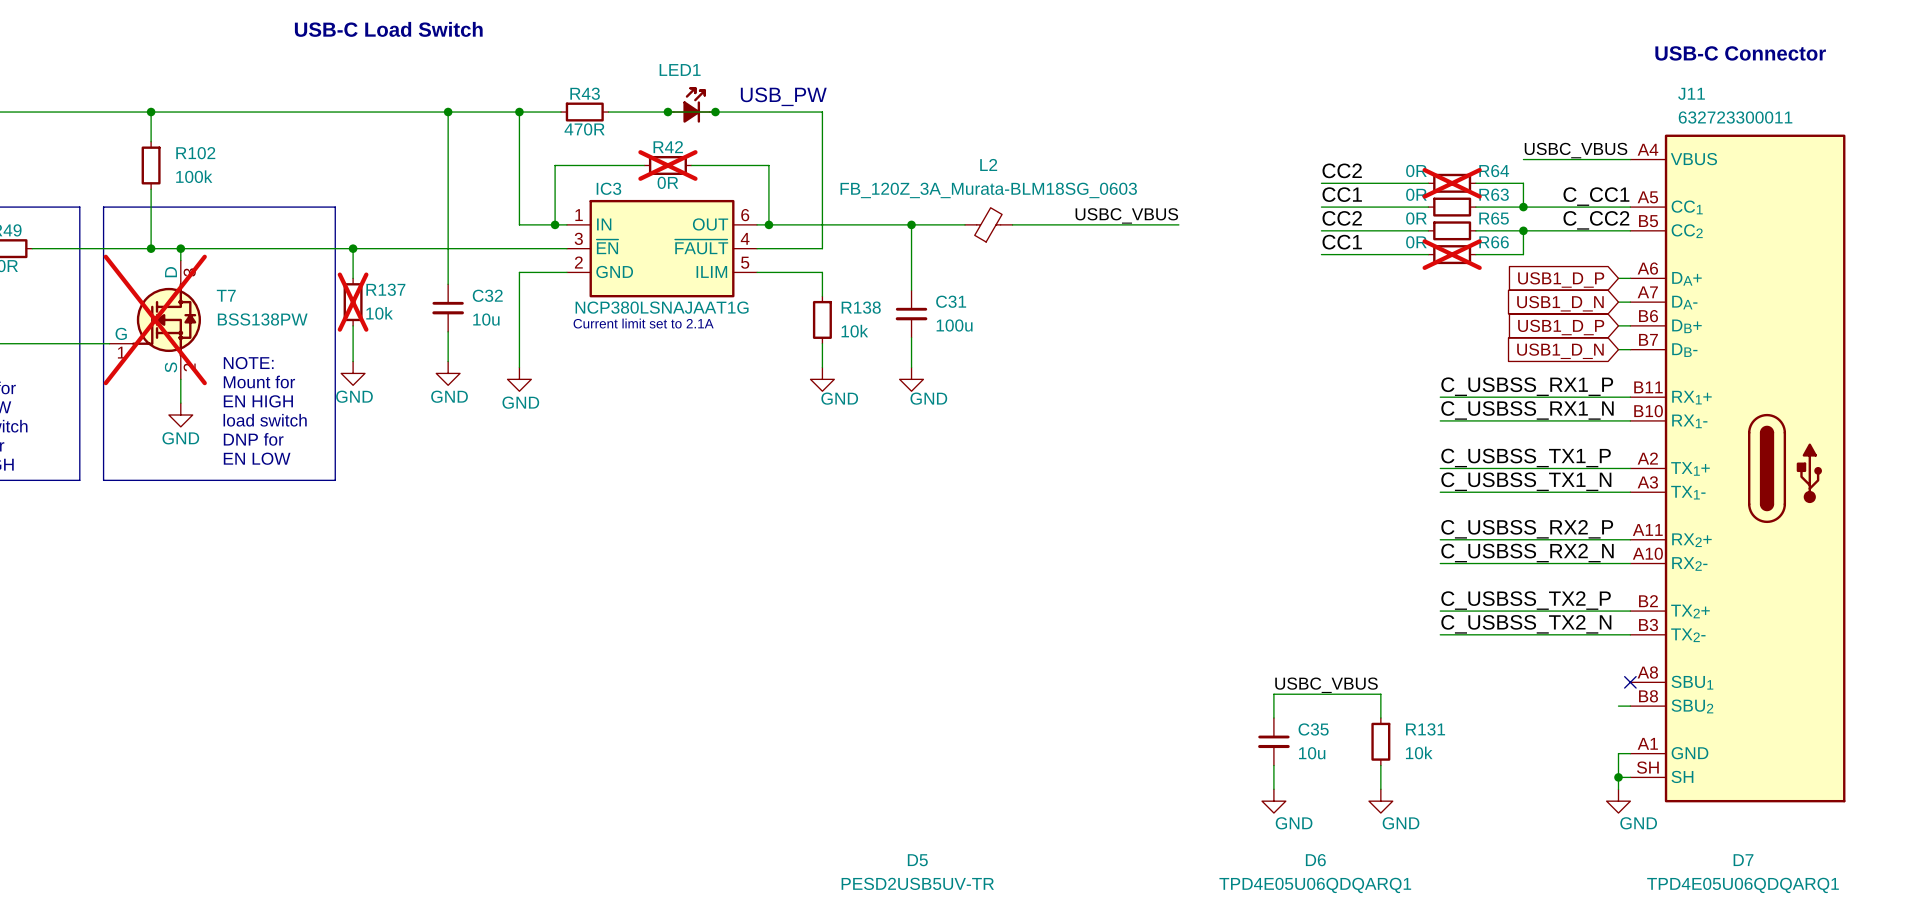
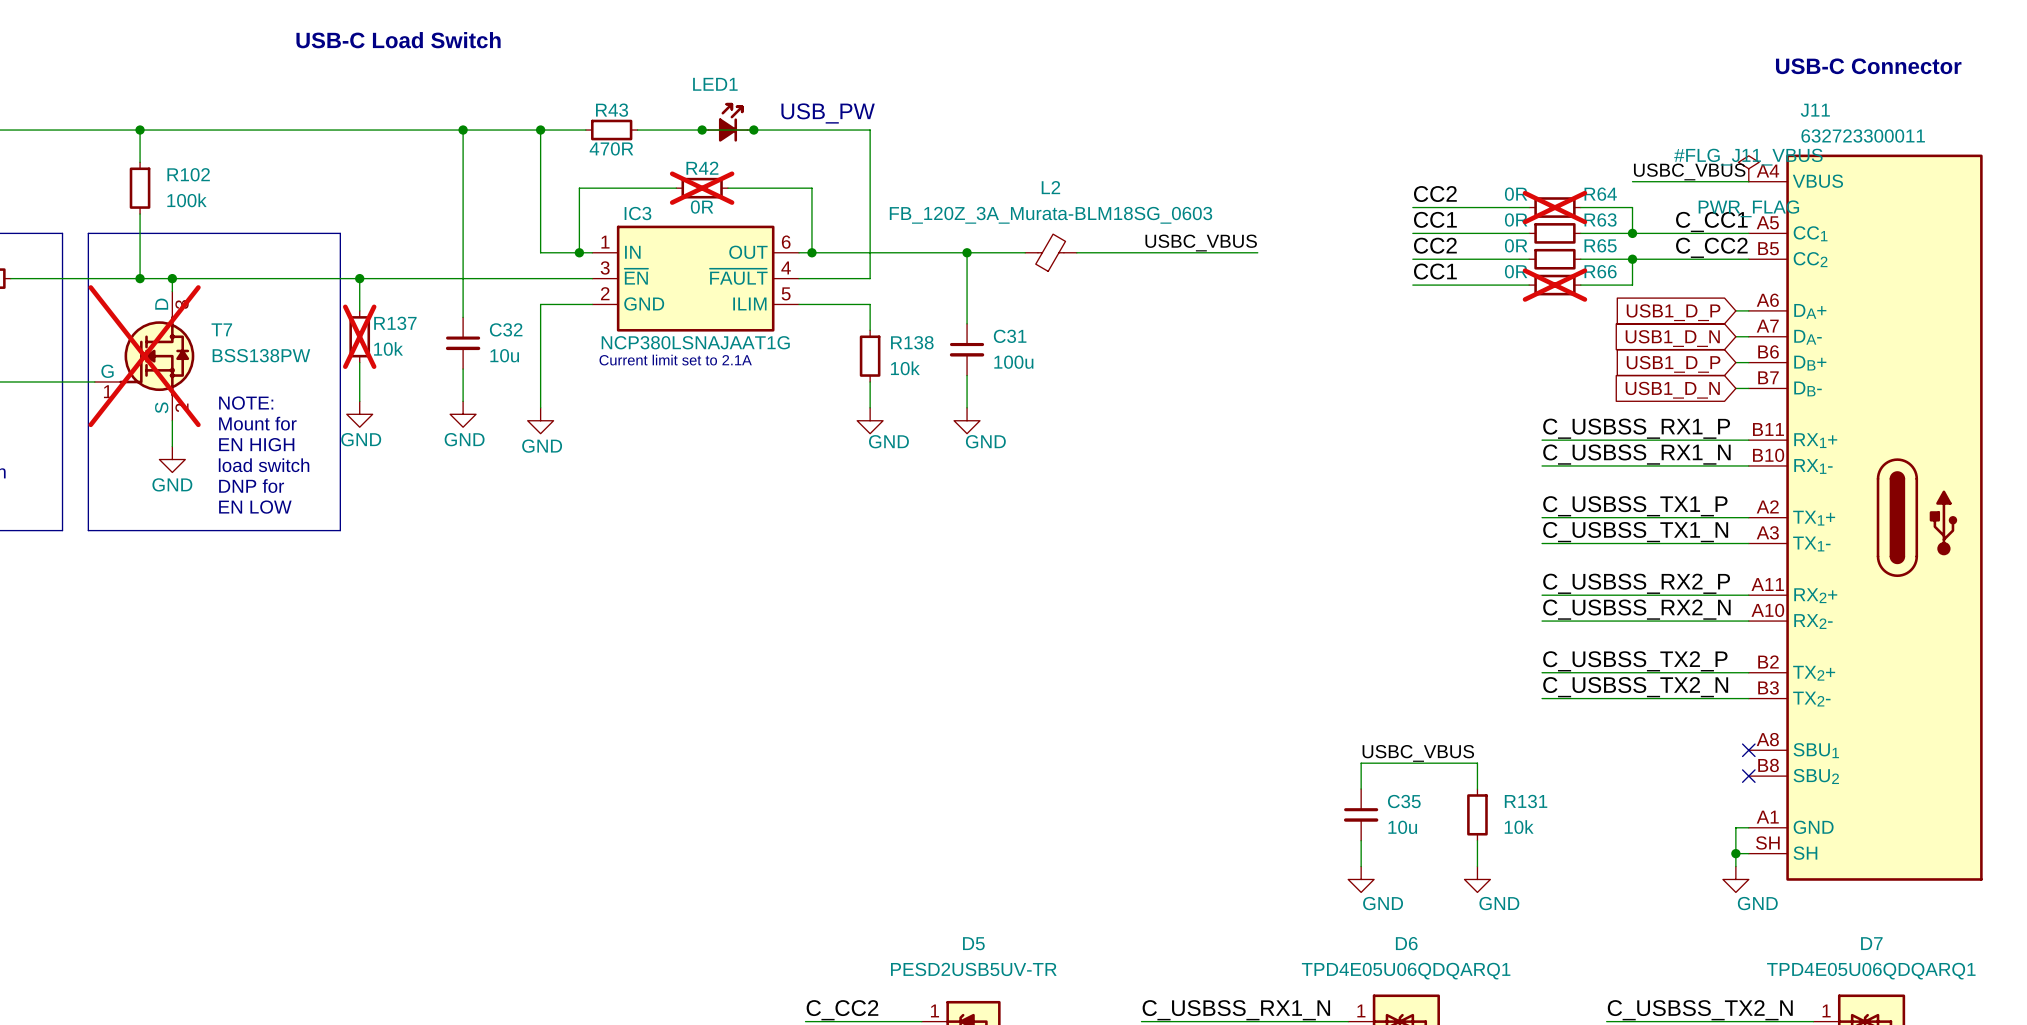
#FLG_J11_VBUS: none -> PWR_FLAG (1748, 168)
wire: (1618, 706) (1630, 706) -> none
no-connect mark: none -> (1748, 776)

